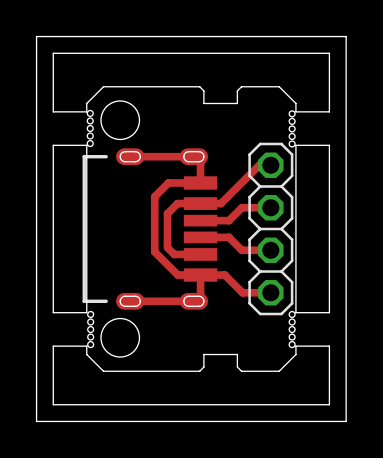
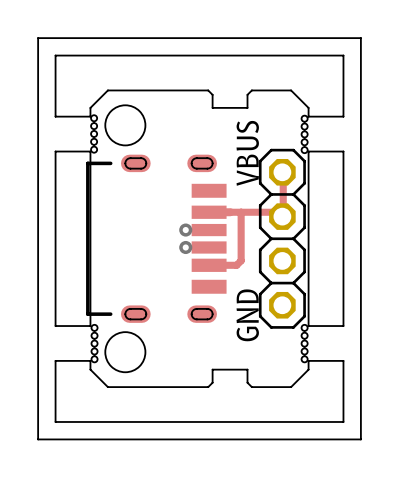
text: none -> VBUS (247, 153)
track: (130, 156) (193, 156) (200, 163) (200, 182) (168, 182) (154, 196) (154, 251) (177, 275) (224, 275) (242, 292) (270, 292) -> none
track: (270, 165) (259, 165) (220, 203) -> (283, 172) (283, 216) (278, 212) (230, 212)
track: (203, 203) (177, 203) (167, 213) (167, 247) (174, 254) (200, 254) -> none
track: none -> (241, 212) (241, 260) (236, 265) (212, 265)
track: (270, 207) (241, 207) (229, 220) (203, 220) -> none
via: none -> (185, 230)
via: none -> (185, 247)
track: (203, 237) (229, 237) (241, 250) (270, 250) -> none
track: (200, 275) (200, 294) (193, 301) (130, 301) -> none
text: none -> GND (247, 315)

